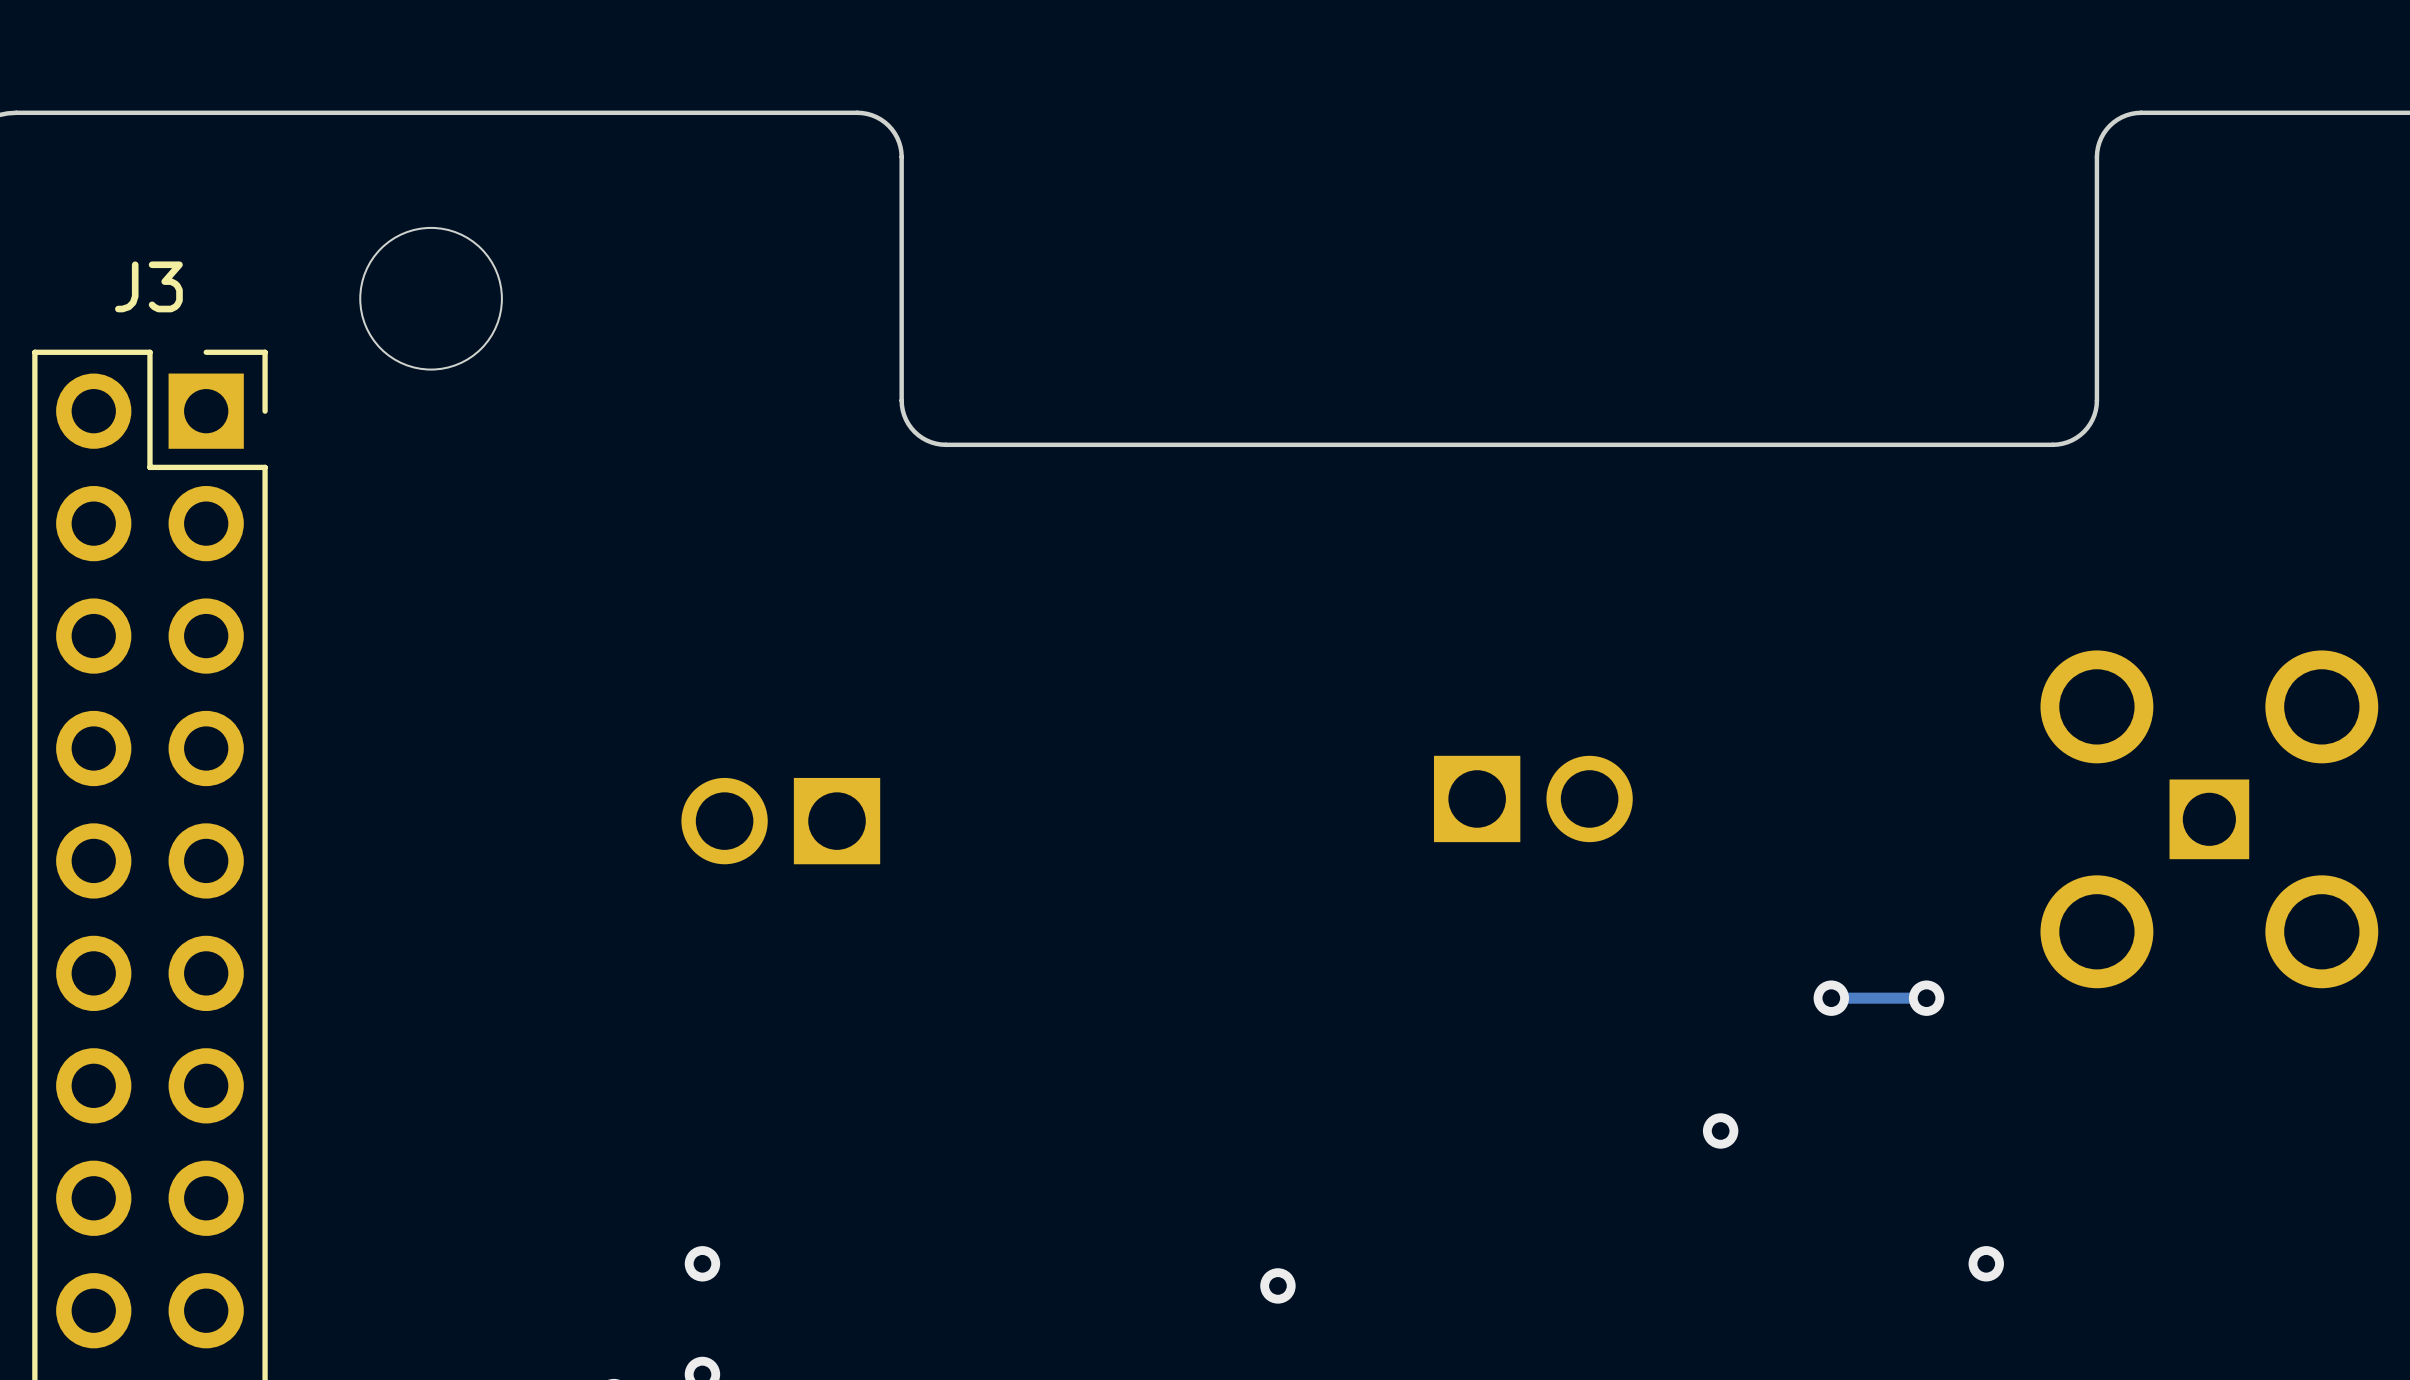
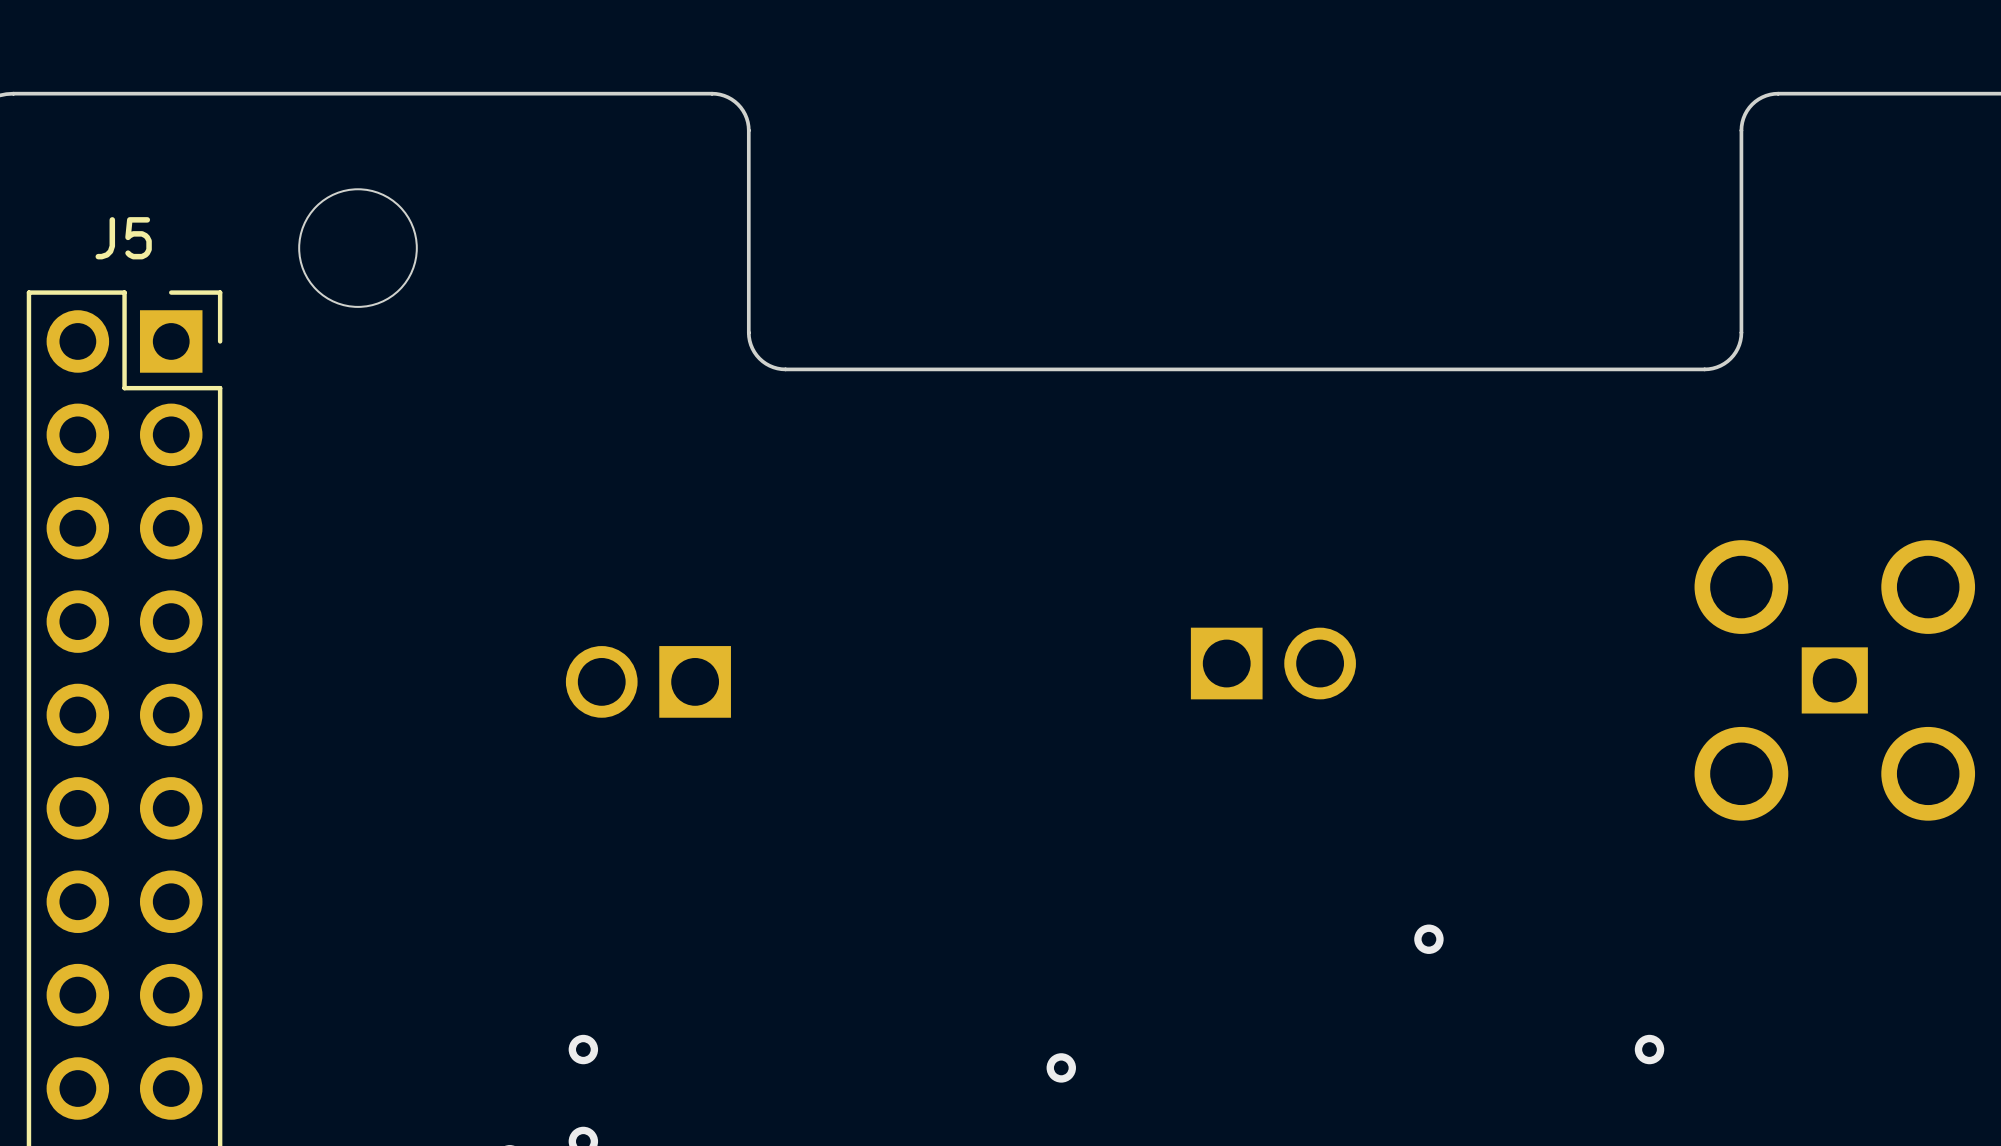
J3 name: J3 (148, 286) -> J5 (123, 238)
via: (1831, 998) -> none
track: (1926, 998) (1831, 998) -> none
via: (1926, 998) -> none

